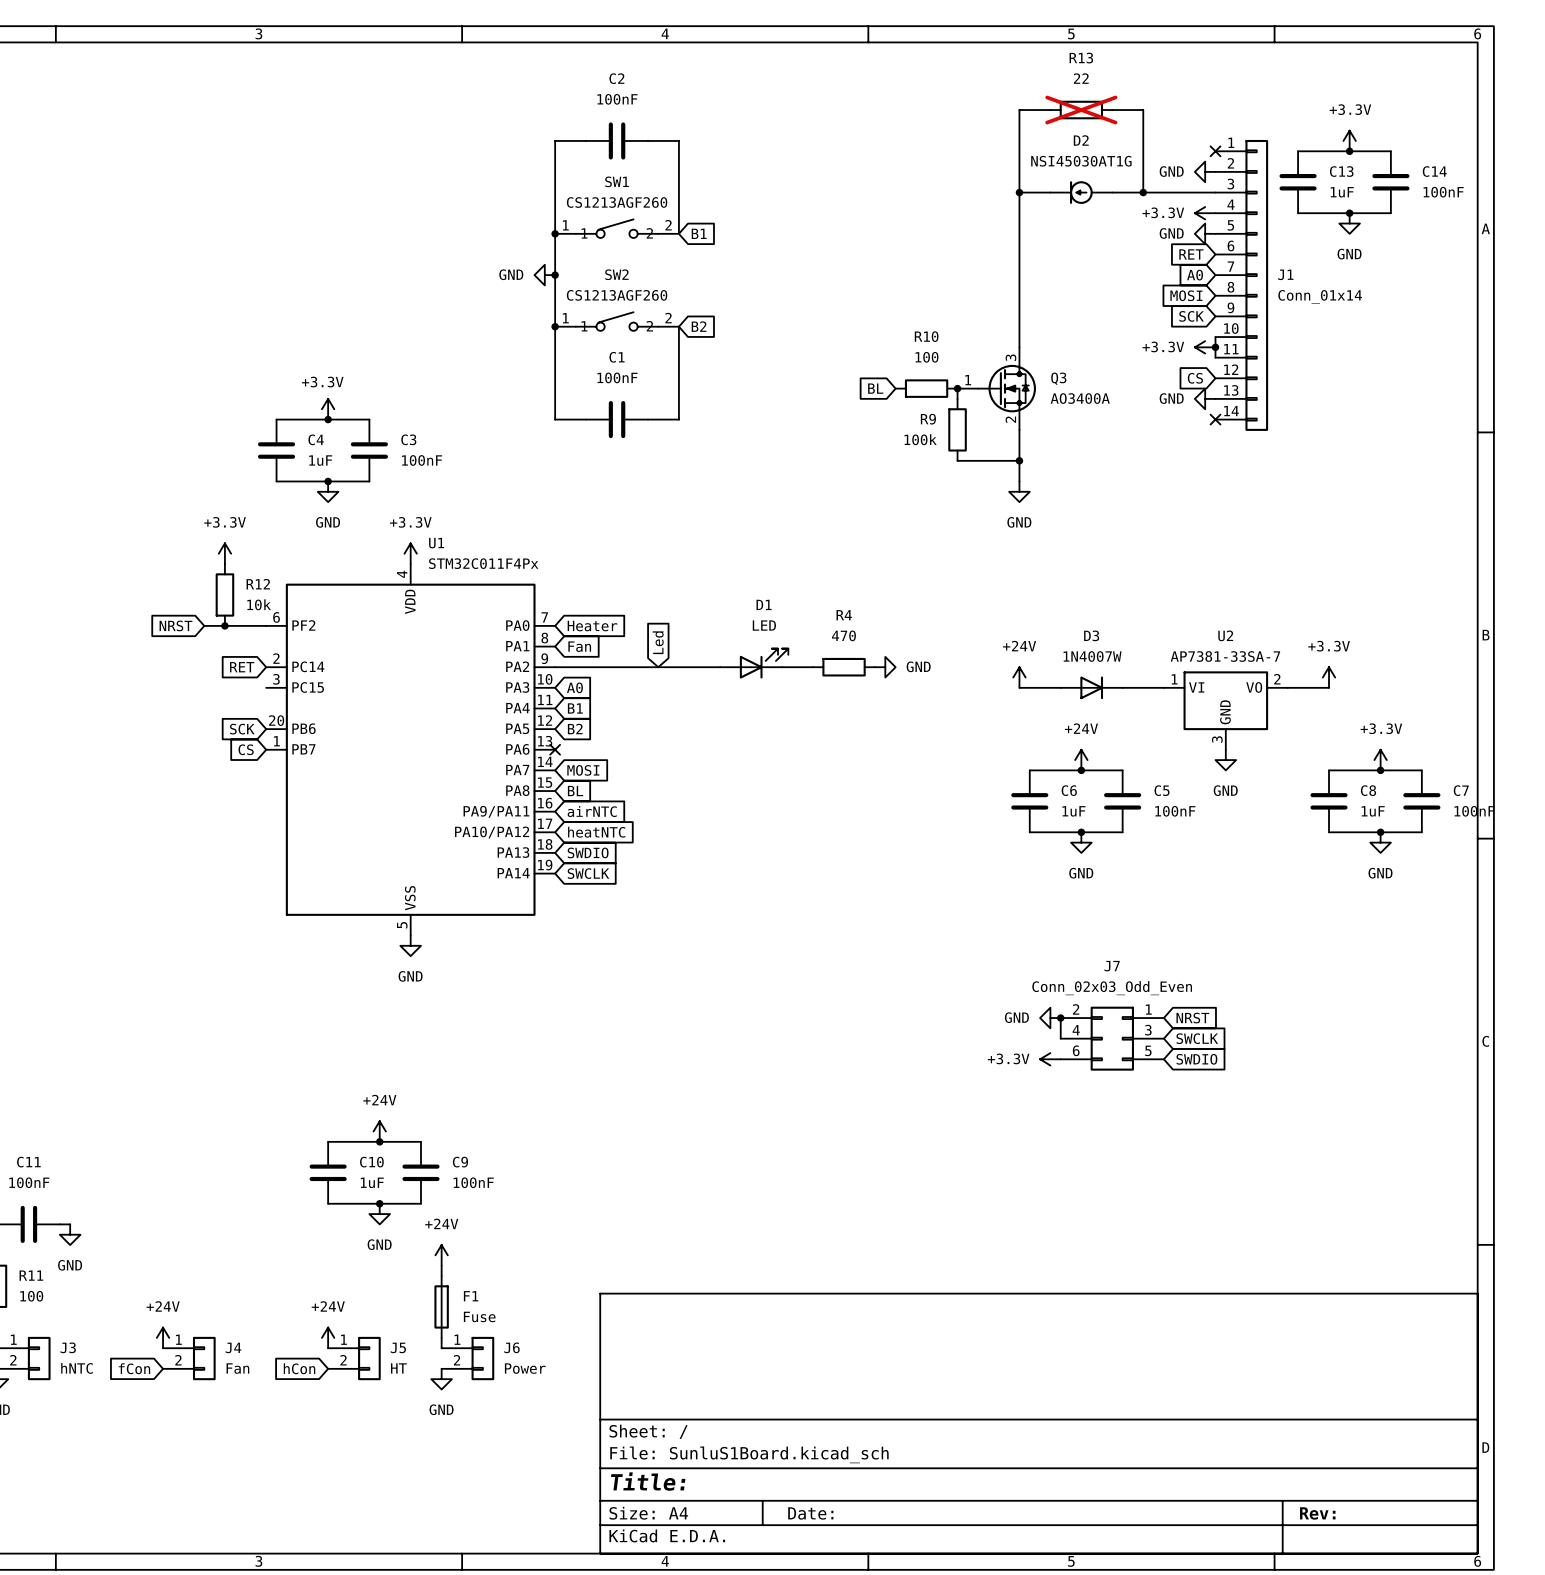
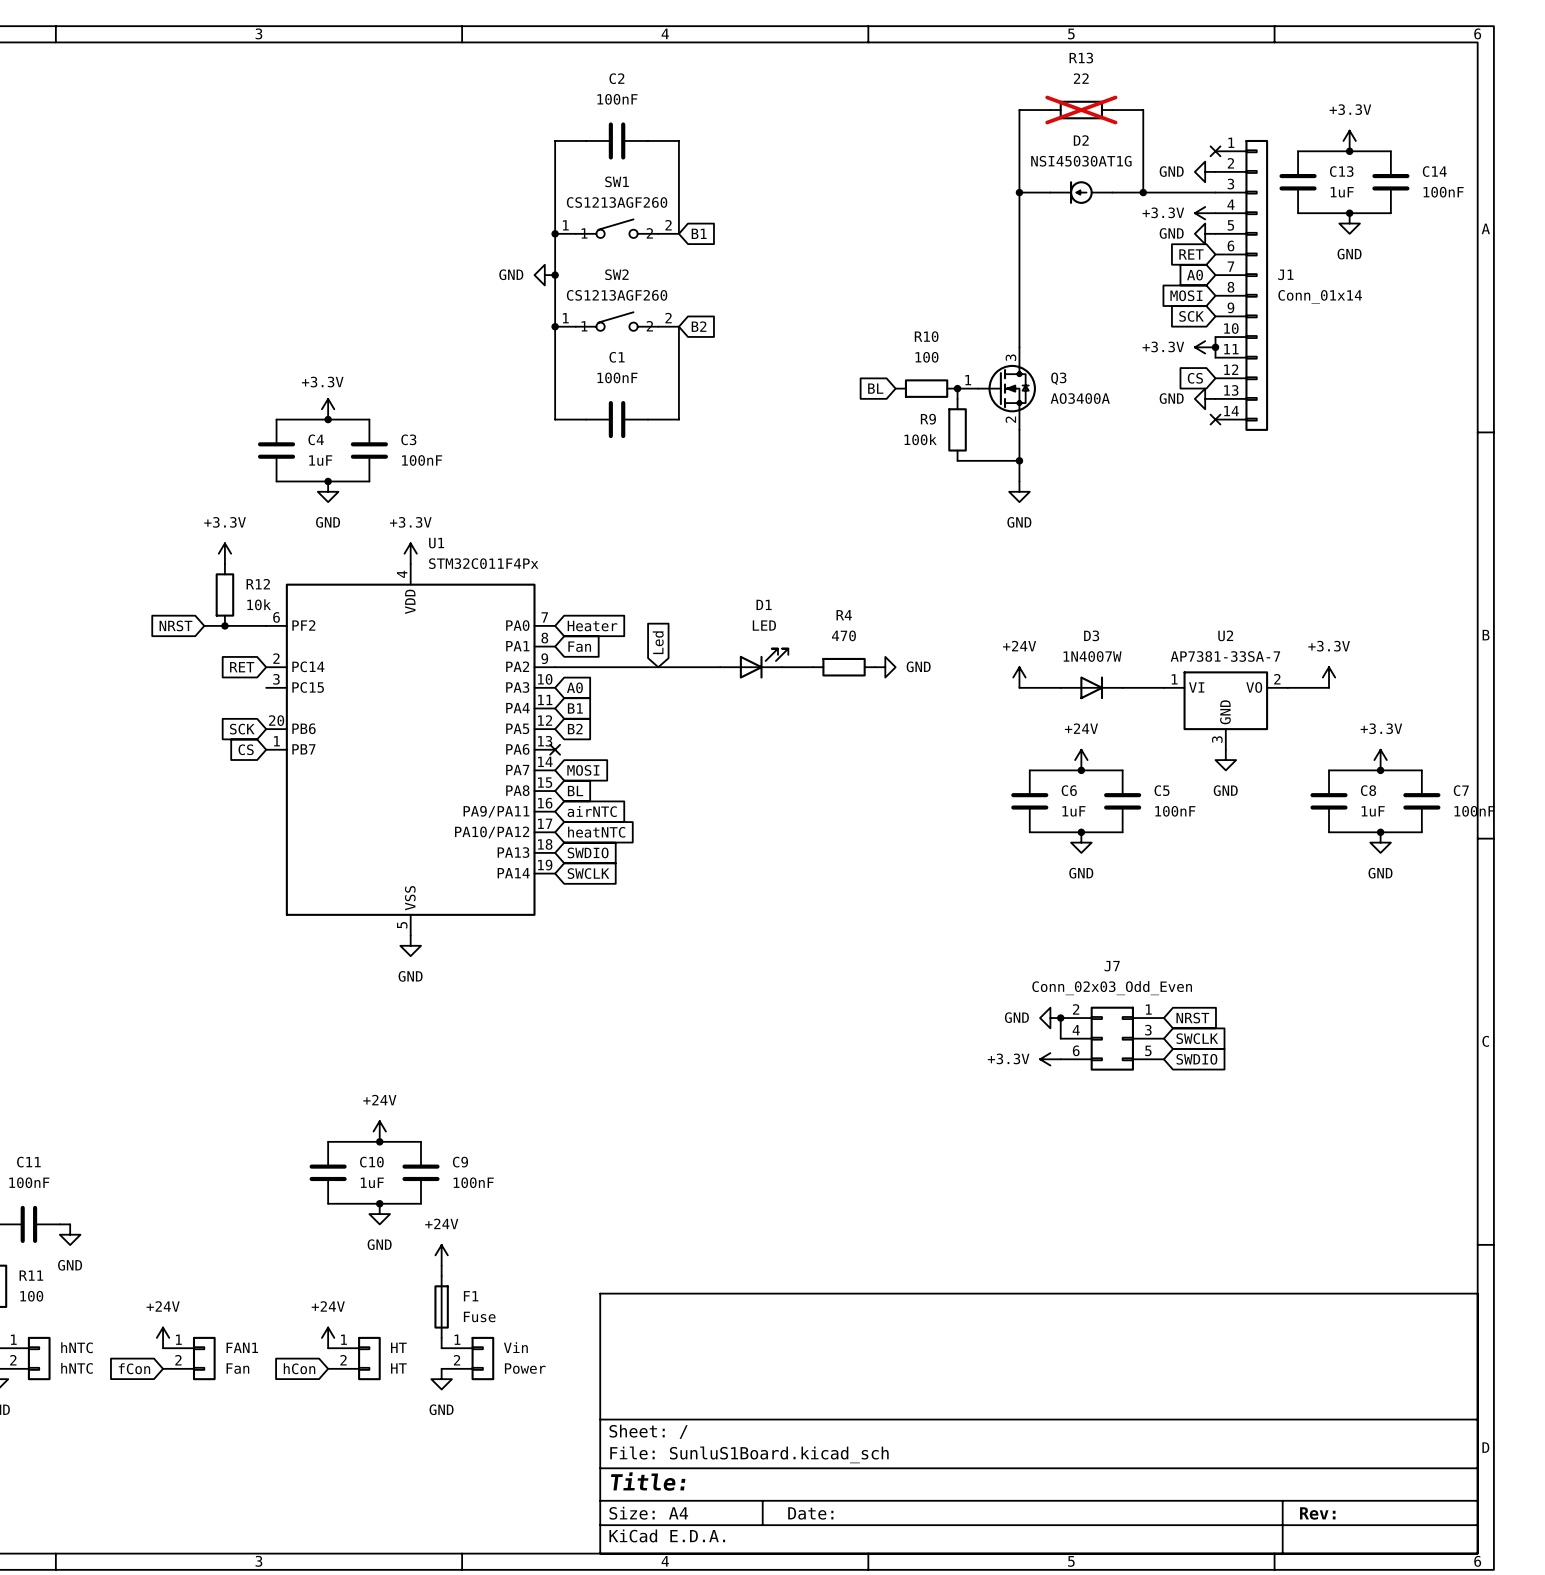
J3 name: J3 (68, 1347) -> hNTC (77, 1347)
J4 name: J4 (233, 1347) -> FAN1 (242, 1347)
J5 name: J5 (398, 1347) -> HT (398, 1347)
J6 name: J6 (511, 1347) -> Vin (515, 1347)

